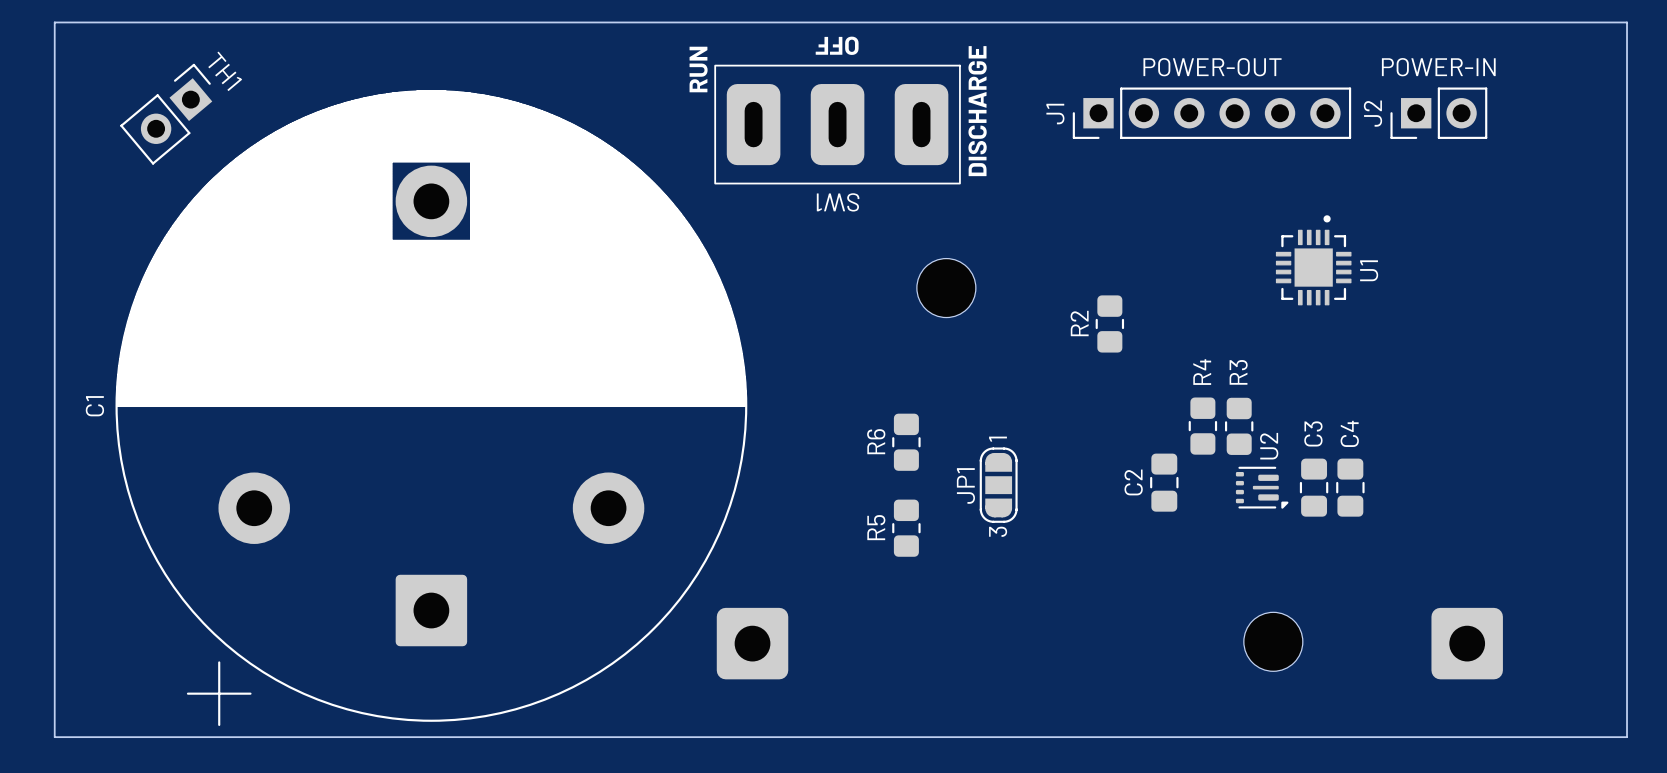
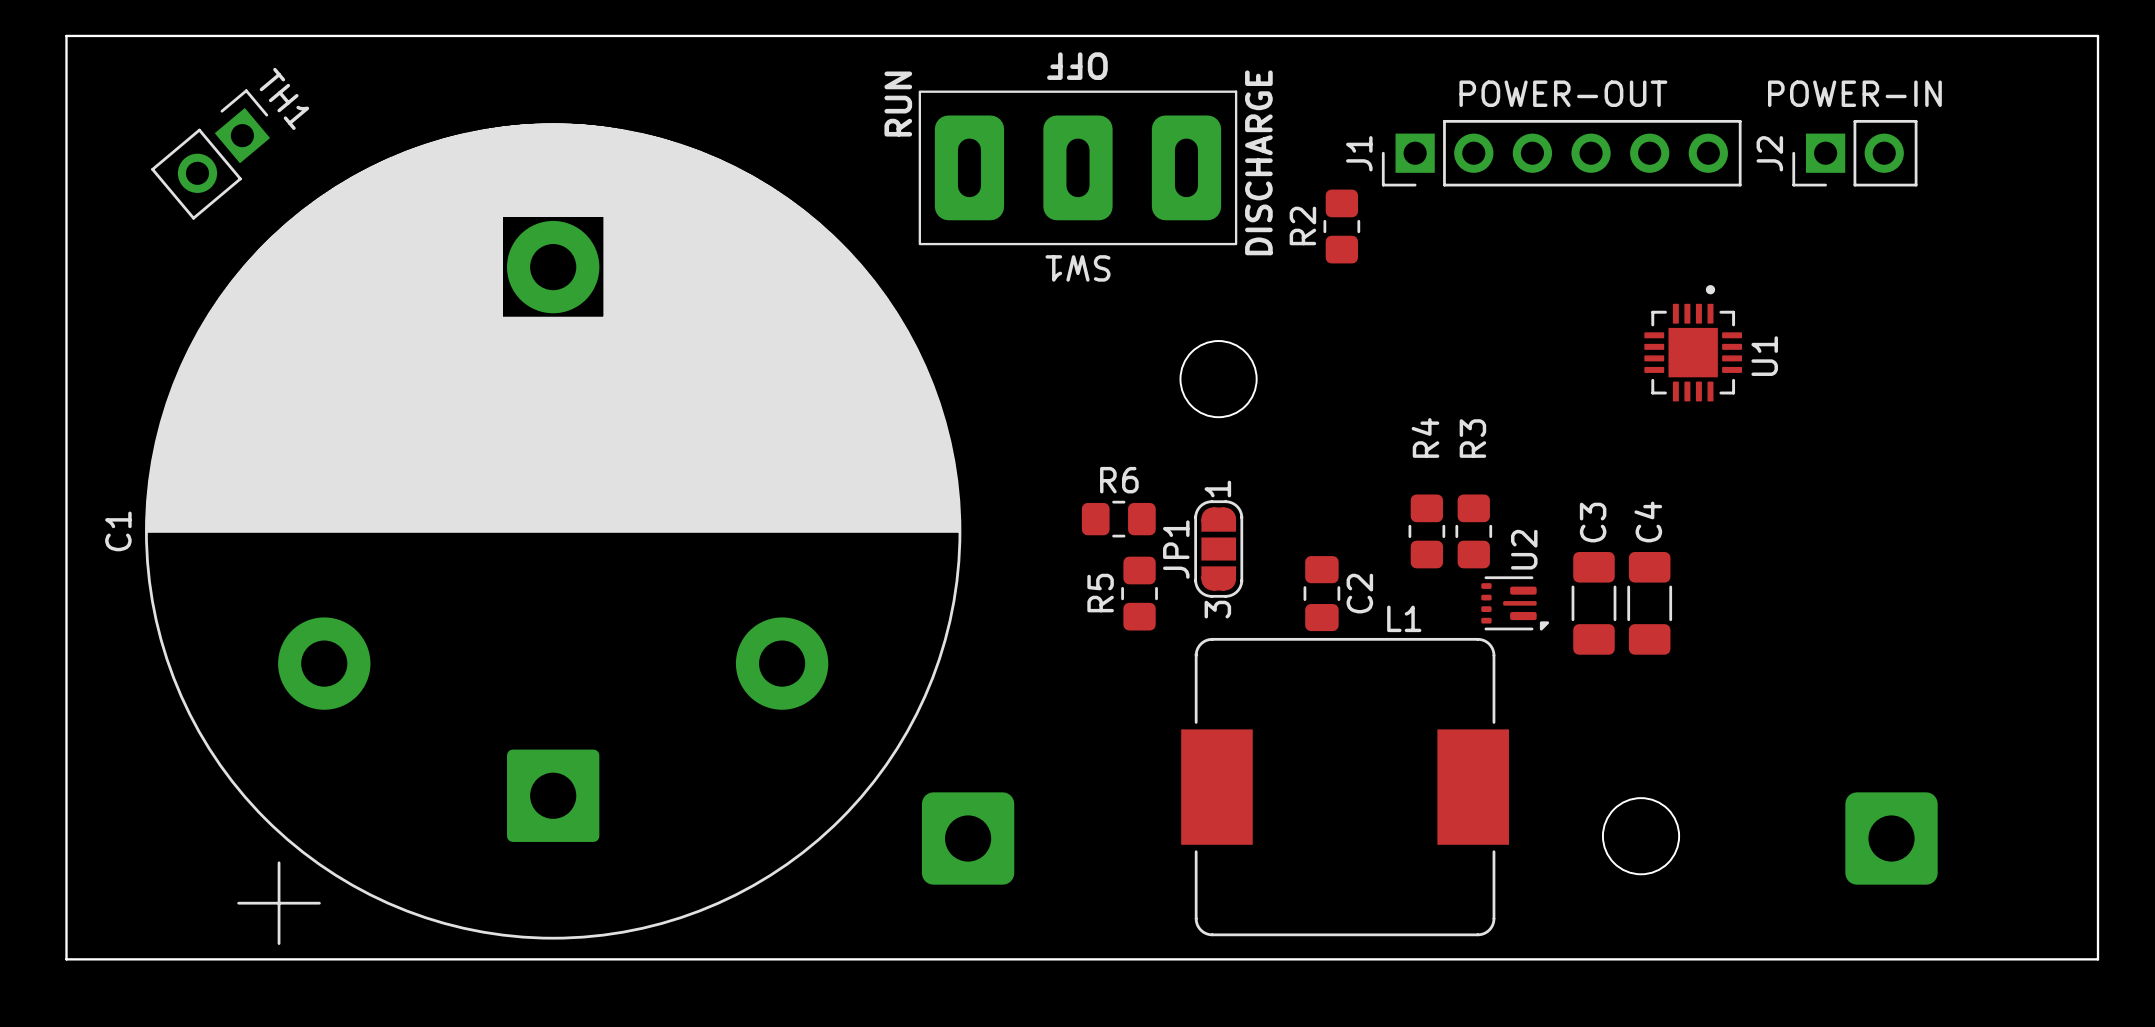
R2 position: (1109, 323) -> (1341, 226)
R4 name position: R4 (1202, 372) -> R4 (1425, 437)
R3 name position: R3 (1238, 372) -> R3 (1472, 438)
R4 position: (1202, 426) -> (1426, 531)
R3 position: (1239, 426) -> (1473, 531)
R6 rotation: 0° (906, 442) -> 90° clockwise (1118, 519)
R6 position: (906, 442) -> (1118, 519)
C3 footprint: [1299, 458, 1329, 517] -> [1571, 551, 1617, 655]
C4 footprint: [1336, 458, 1365, 517] -> [1627, 551, 1673, 655]
C2 name position: C2 (1133, 482) -> C2 (1359, 593)
C2 position: (1164, 482) -> (1321, 593)
JP1 position: (998, 485) -> (1218, 549)
U2 position: (1262, 487) -> (1515, 603)
R5 position: (906, 528) -> (1139, 593)
L1: none -> (1345, 787)

